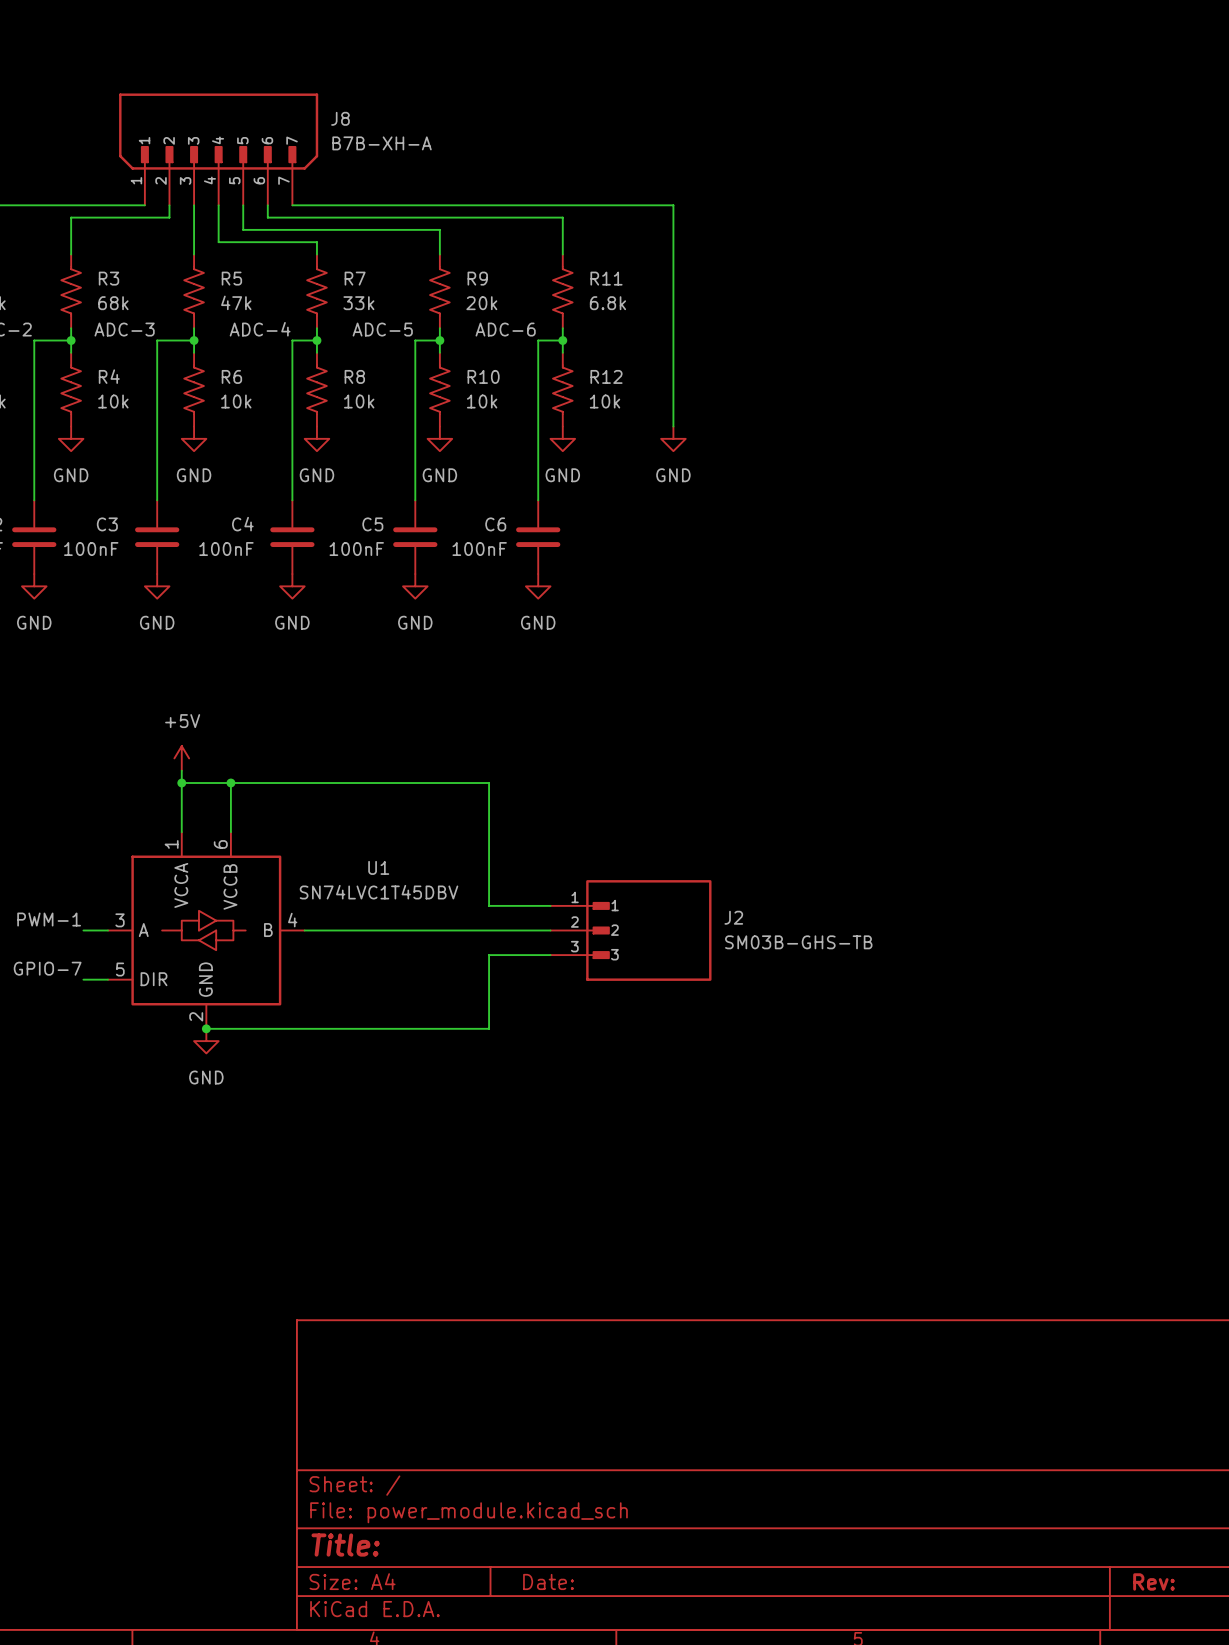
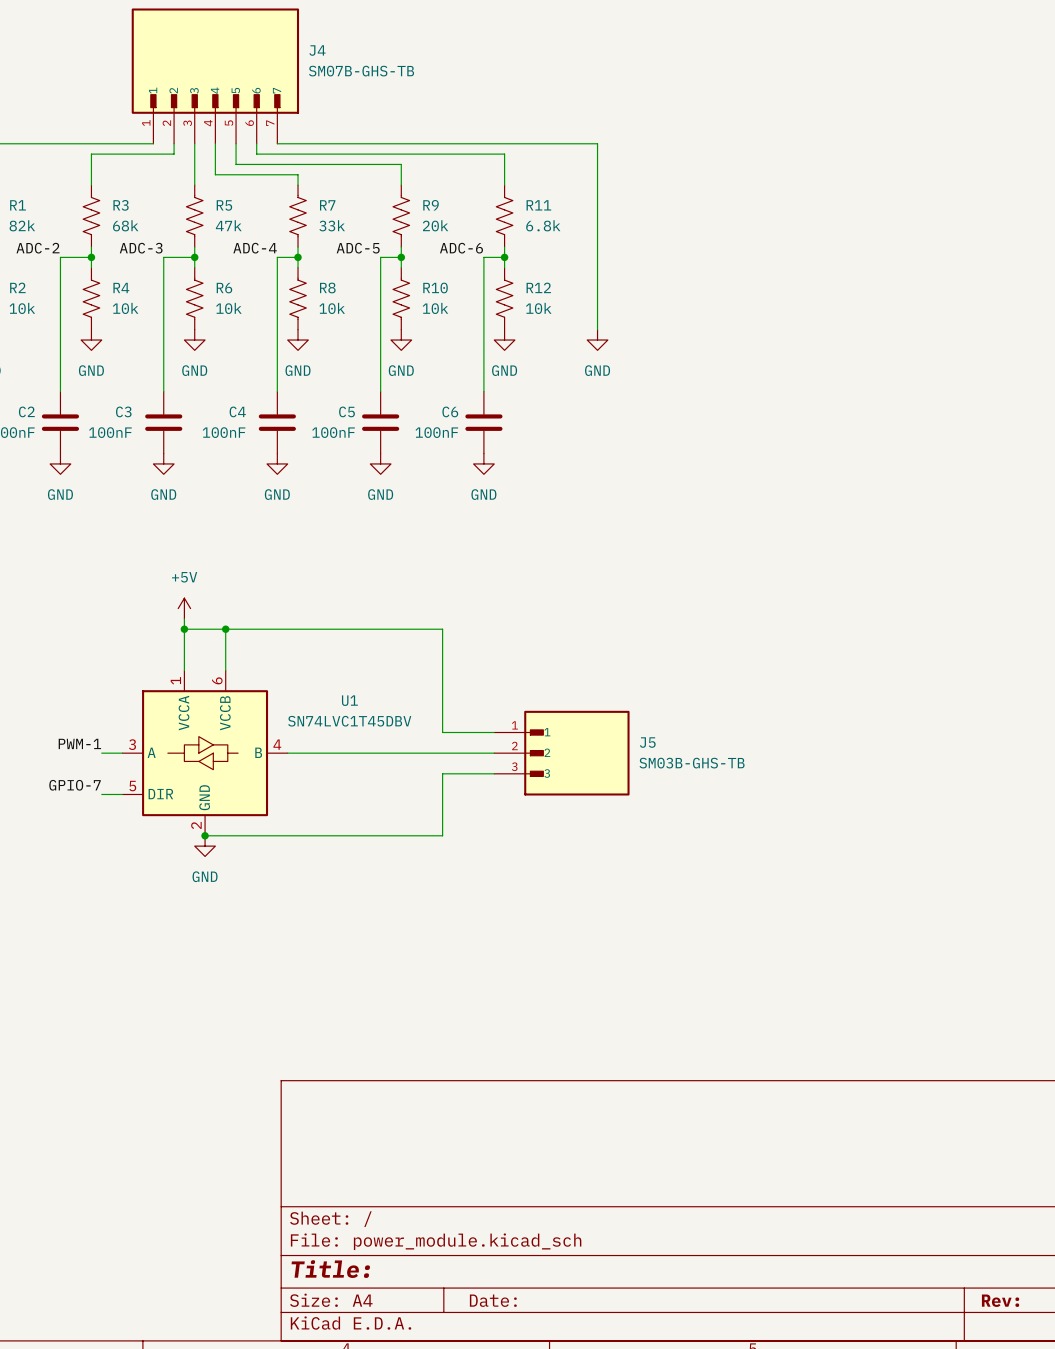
J4: none -> SM07B-GHS-TB (215, 76)
J8: B7B-XH-A (218, 149) -> none
J2 name: J2 (733, 917) -> J5 (647, 742)

